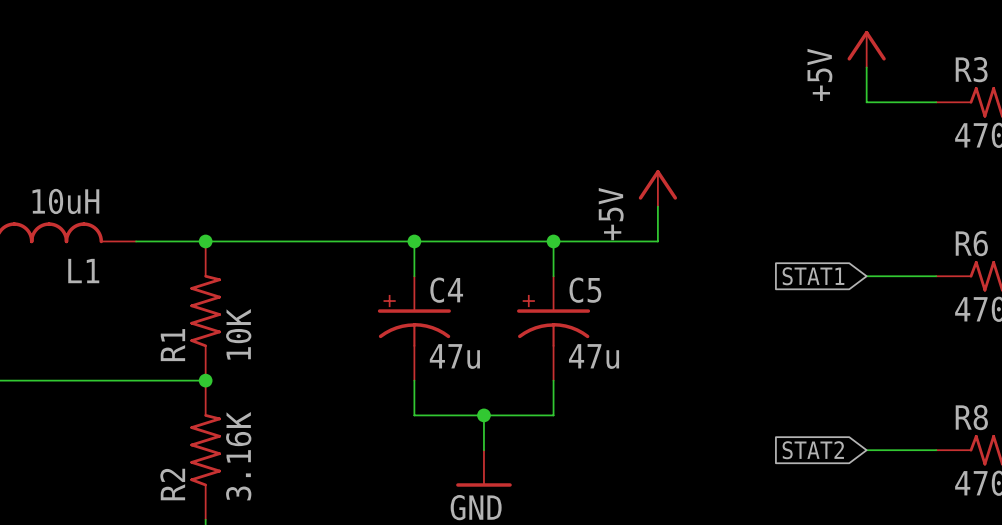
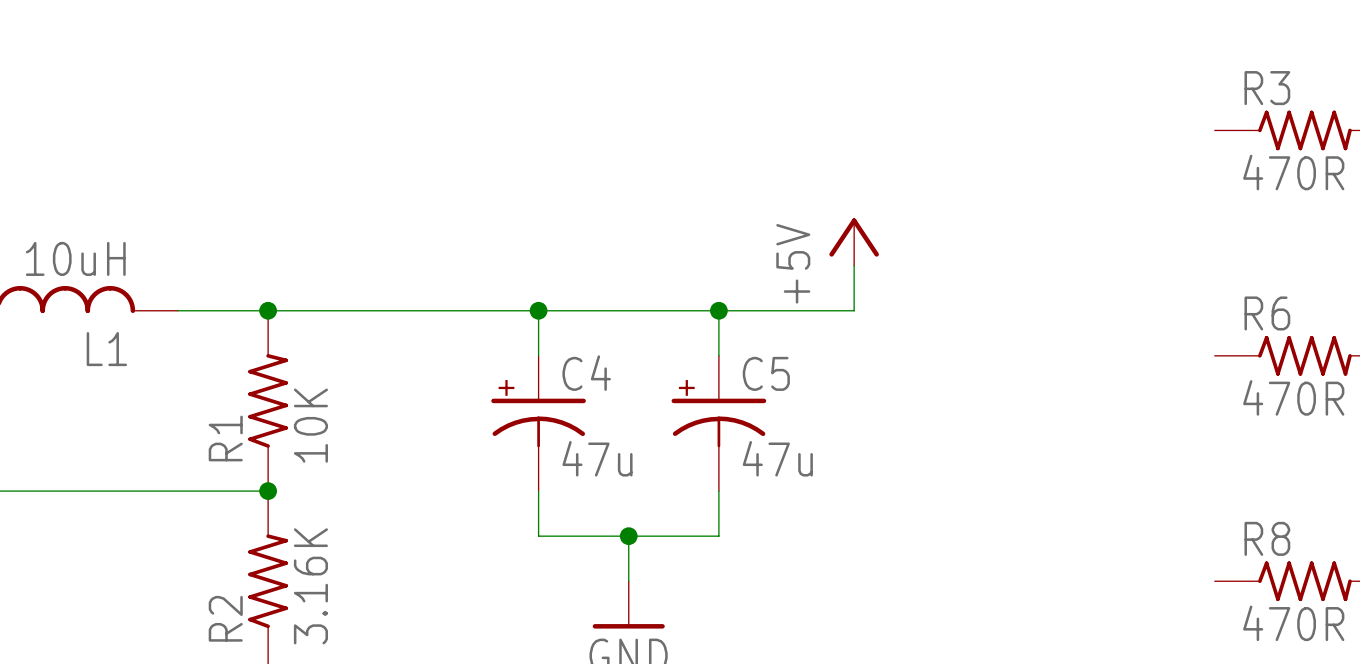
power symbol: +5V (866, 49) -> none
wire: (866, 67) (866, 102) (936, 102) -> none
global label: STAT1 (813, 276) -> none
wire: (866, 276) (936, 276) -> none
global label: STAT2 (813, 450) -> none
wire: (866, 450) (936, 450) -> none

